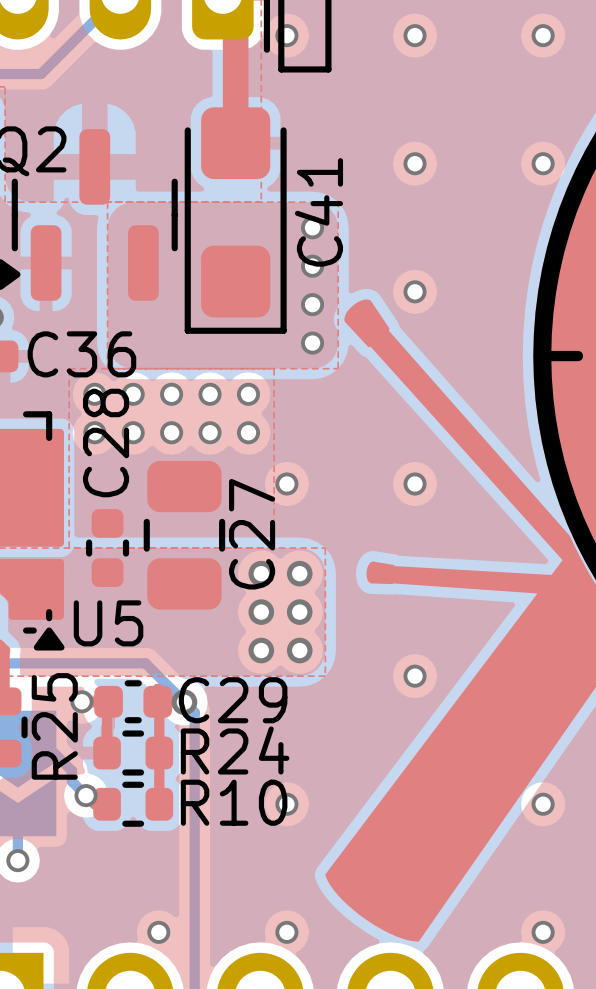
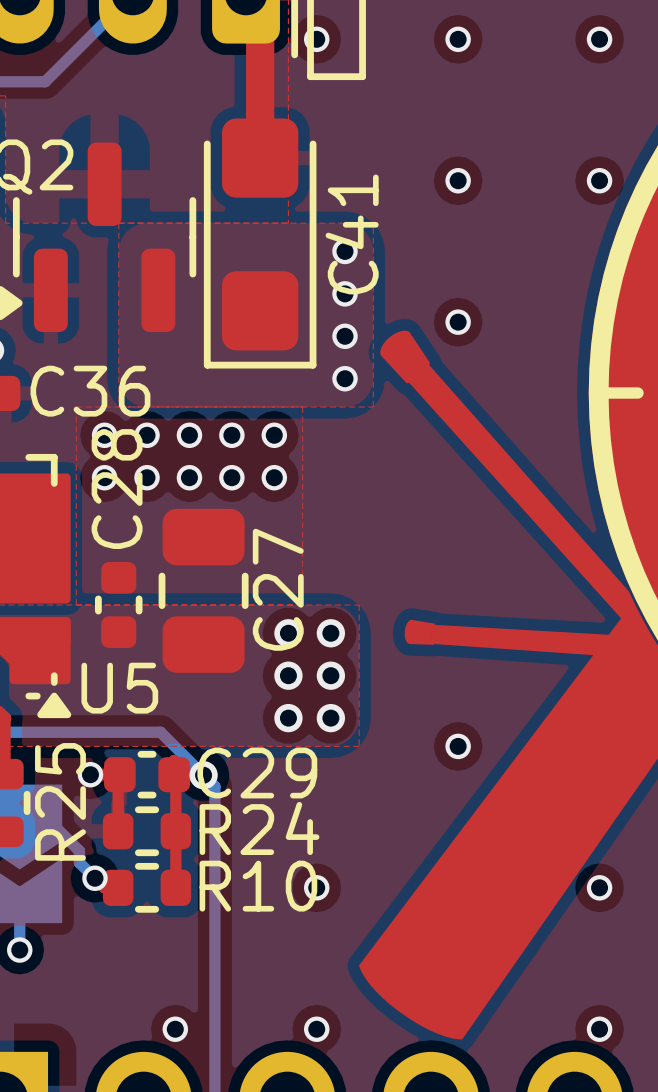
via: (286, 483) -> none
via: (415, 483) -> none

